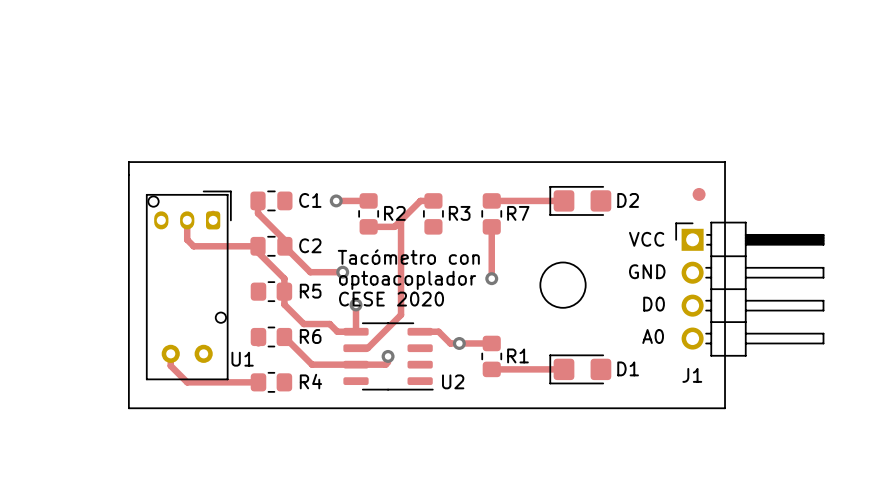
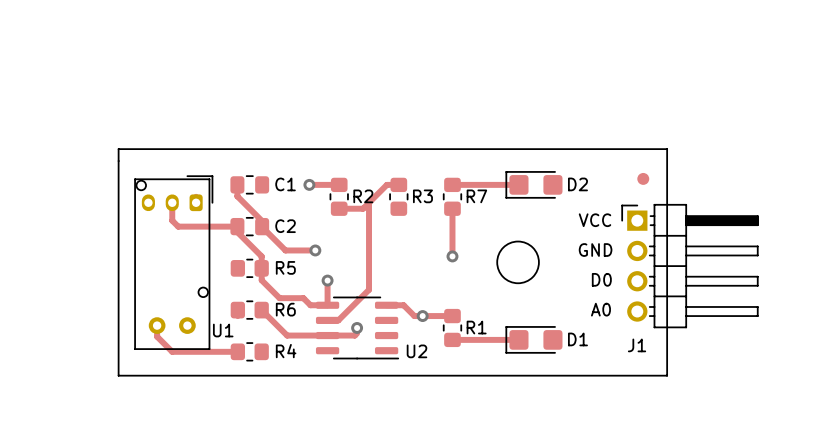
text: Tacómetro con (408, 257) -> none
text: optoacoplador (407, 280) -> none
text: CESE 2020 (391, 299) -> none

